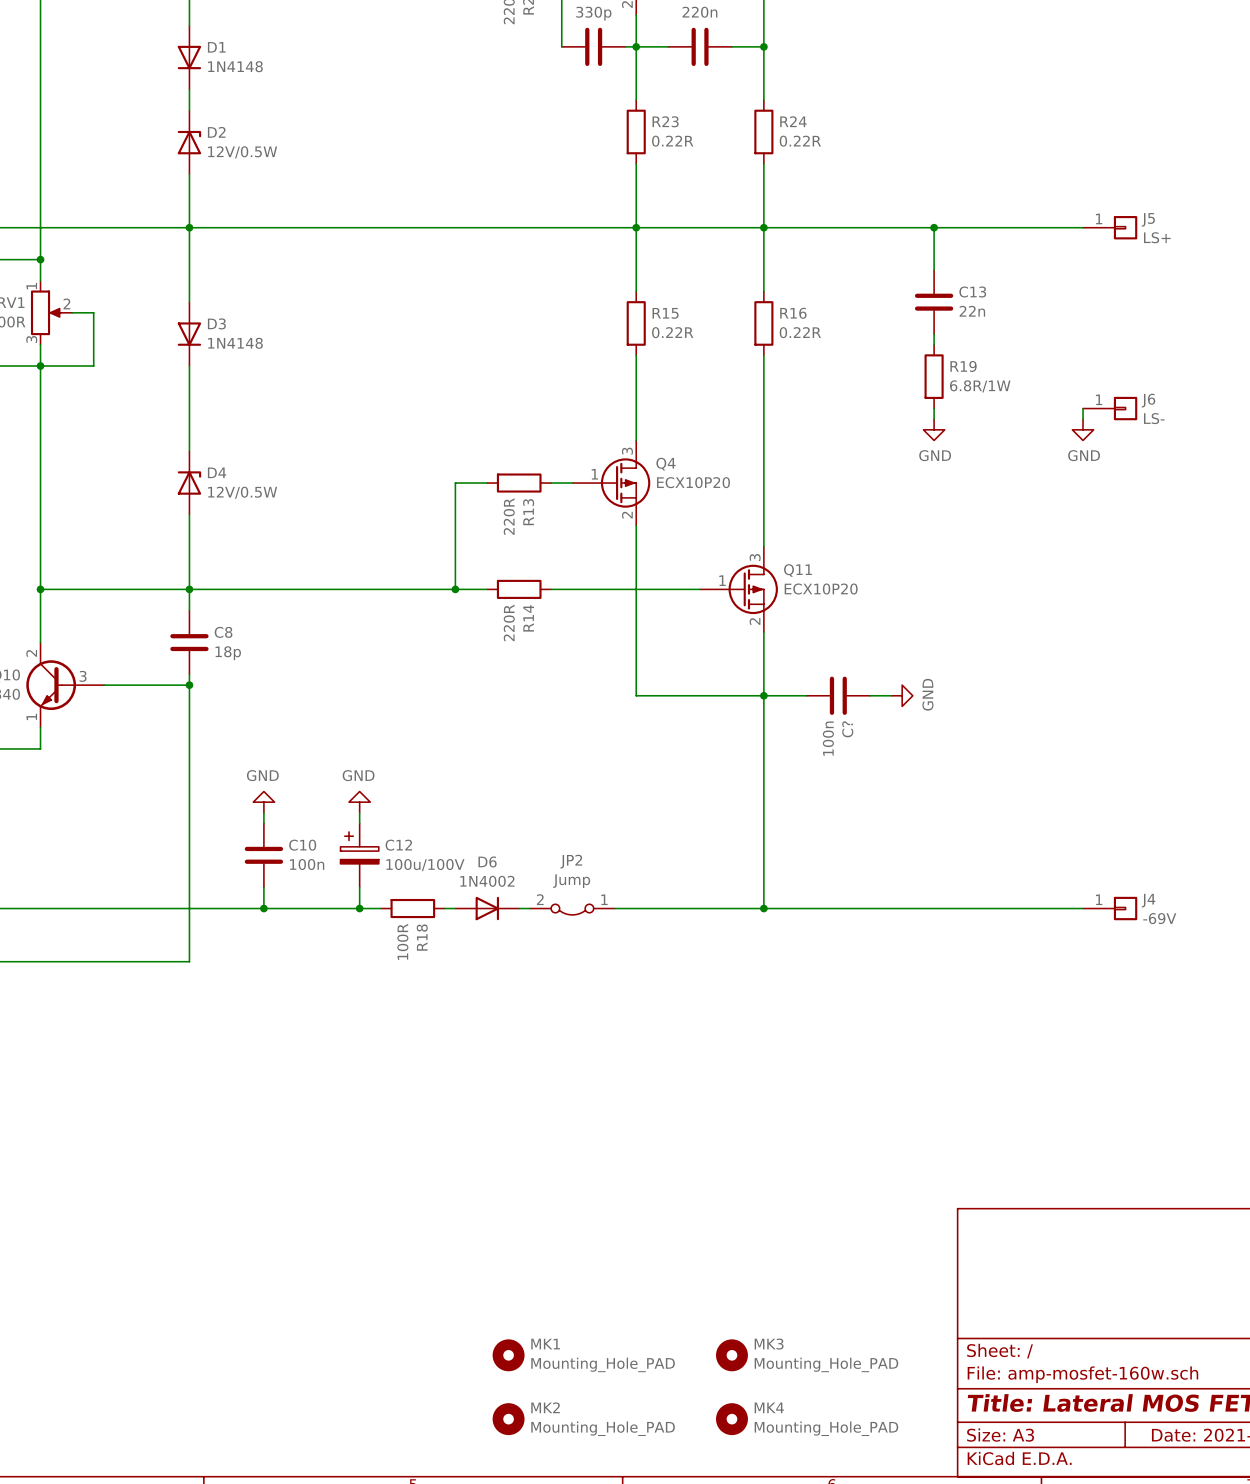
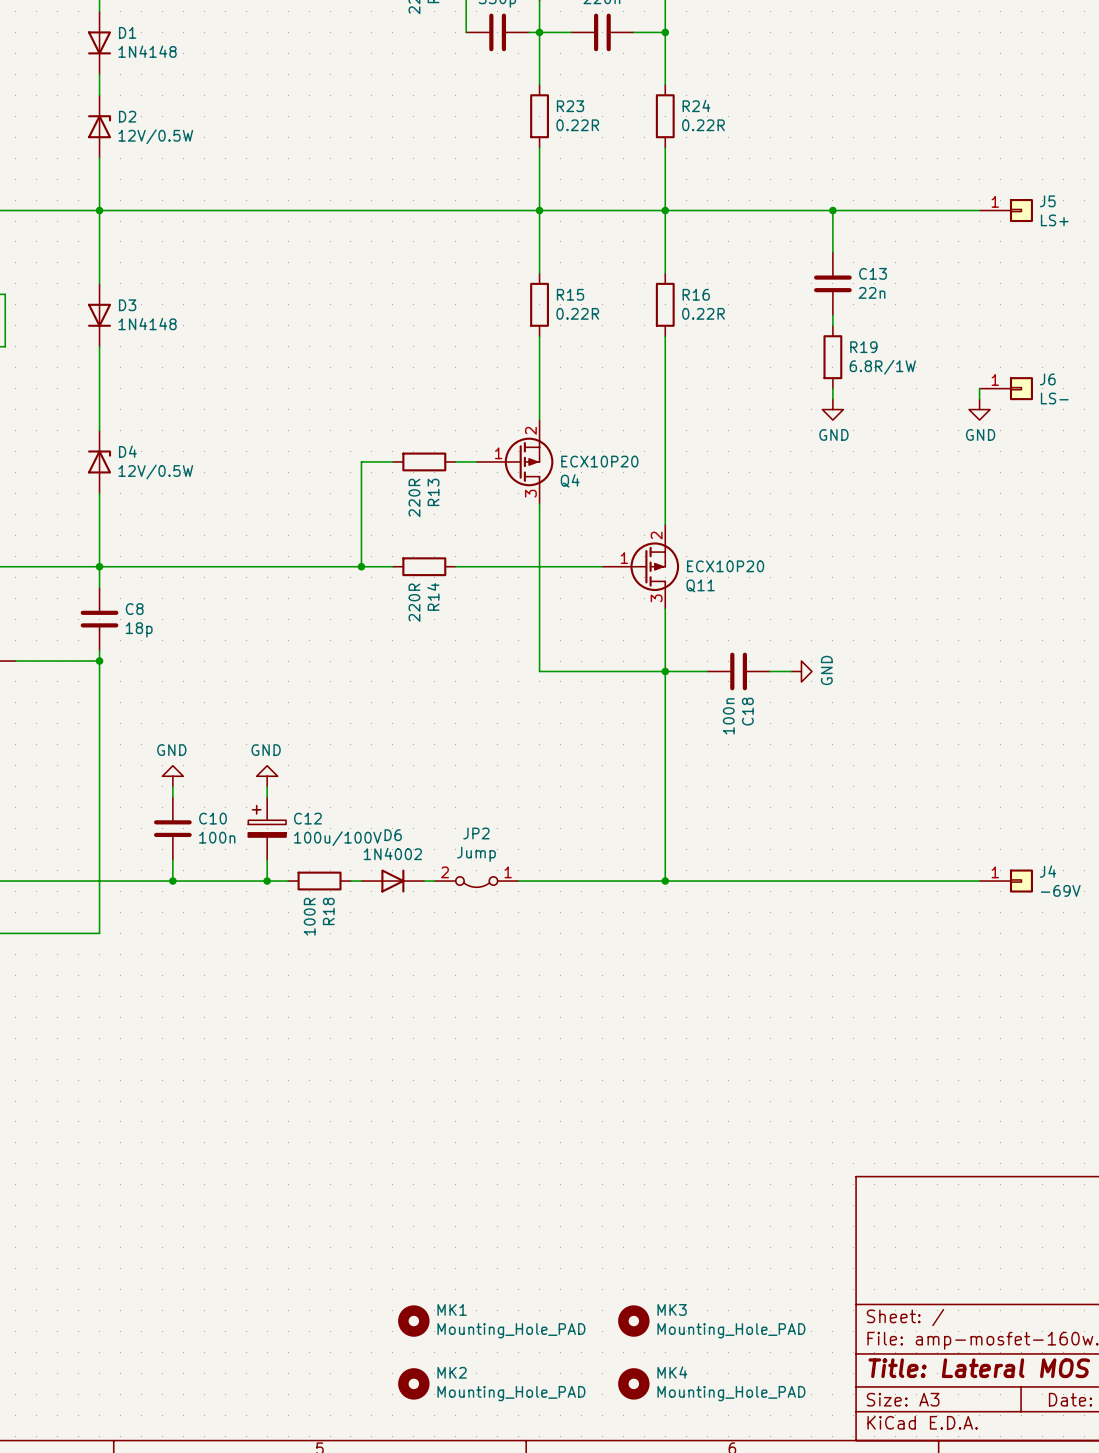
Q4 flip: as is (625, 483) -> up-down (529, 461)
Q11 flip: as is (753, 589) -> up-down (654, 566)
C? name: C? (847, 729) -> C18 (747, 711)

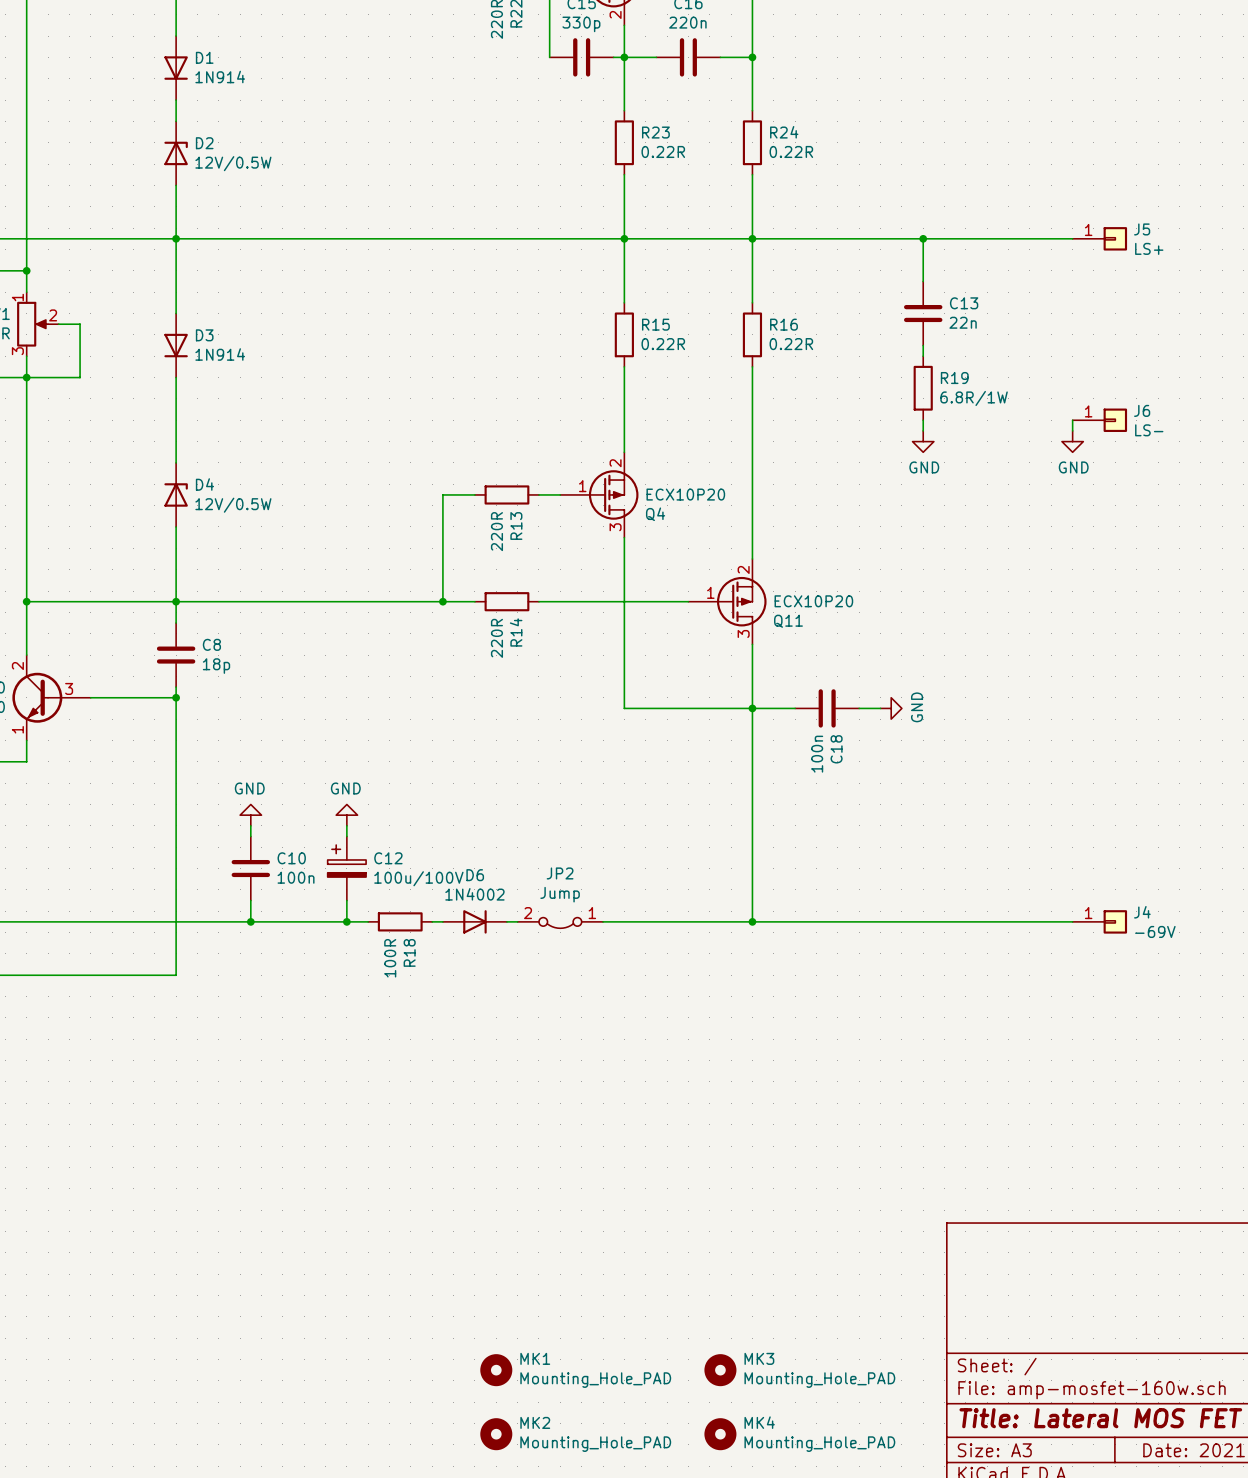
D1 value: 1N4148 (147, 51) -> 1N914 (220, 77)
D3 value: 1N4148 (147, 324) -> 1N914 (220, 354)

